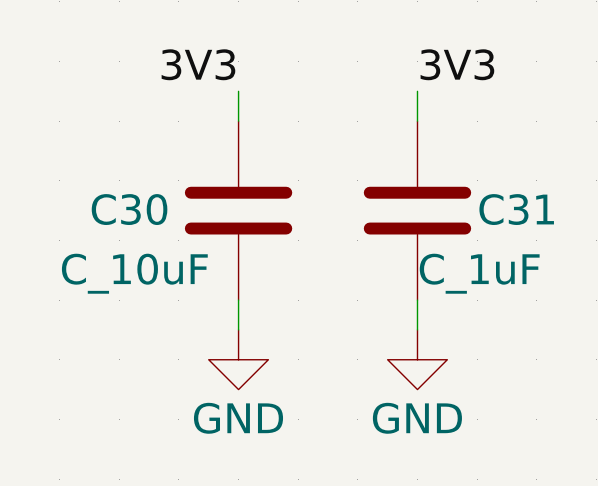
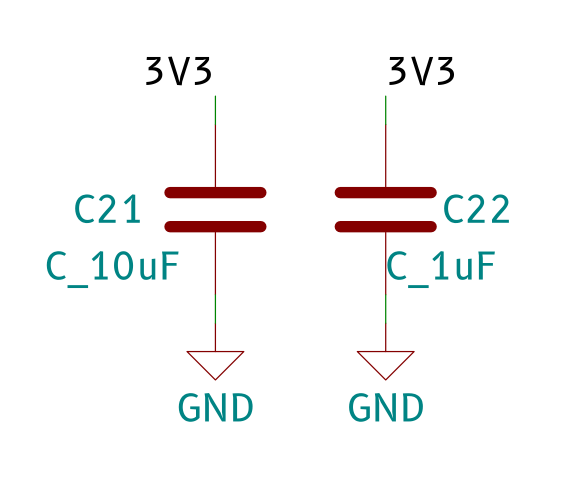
C30 name: C30 (129, 209) -> C21 (107, 208)
C31 name: C31 (516, 209) -> C22 (476, 208)

